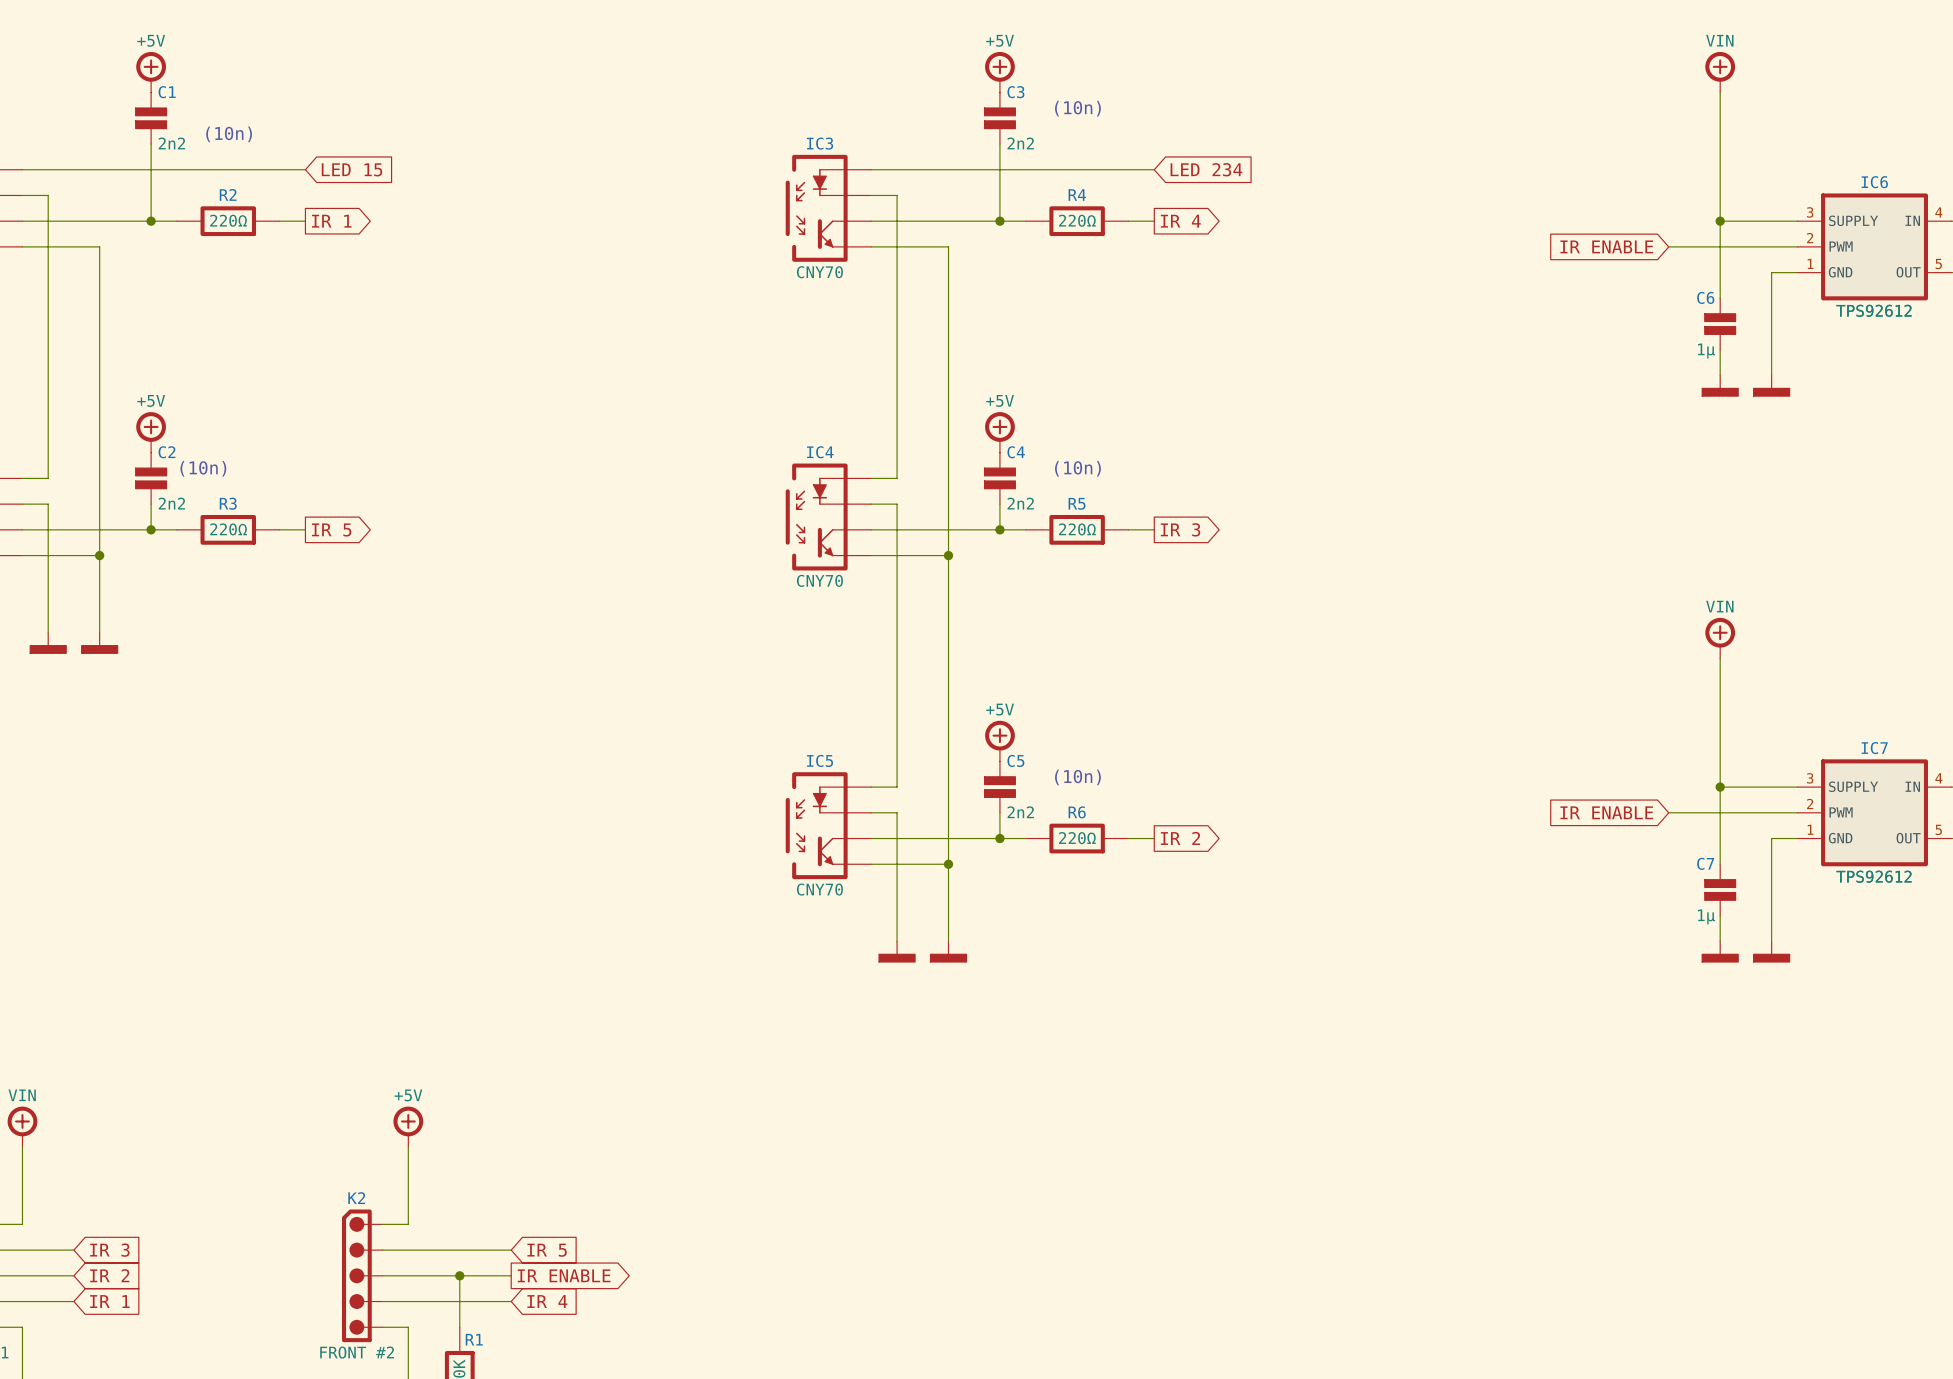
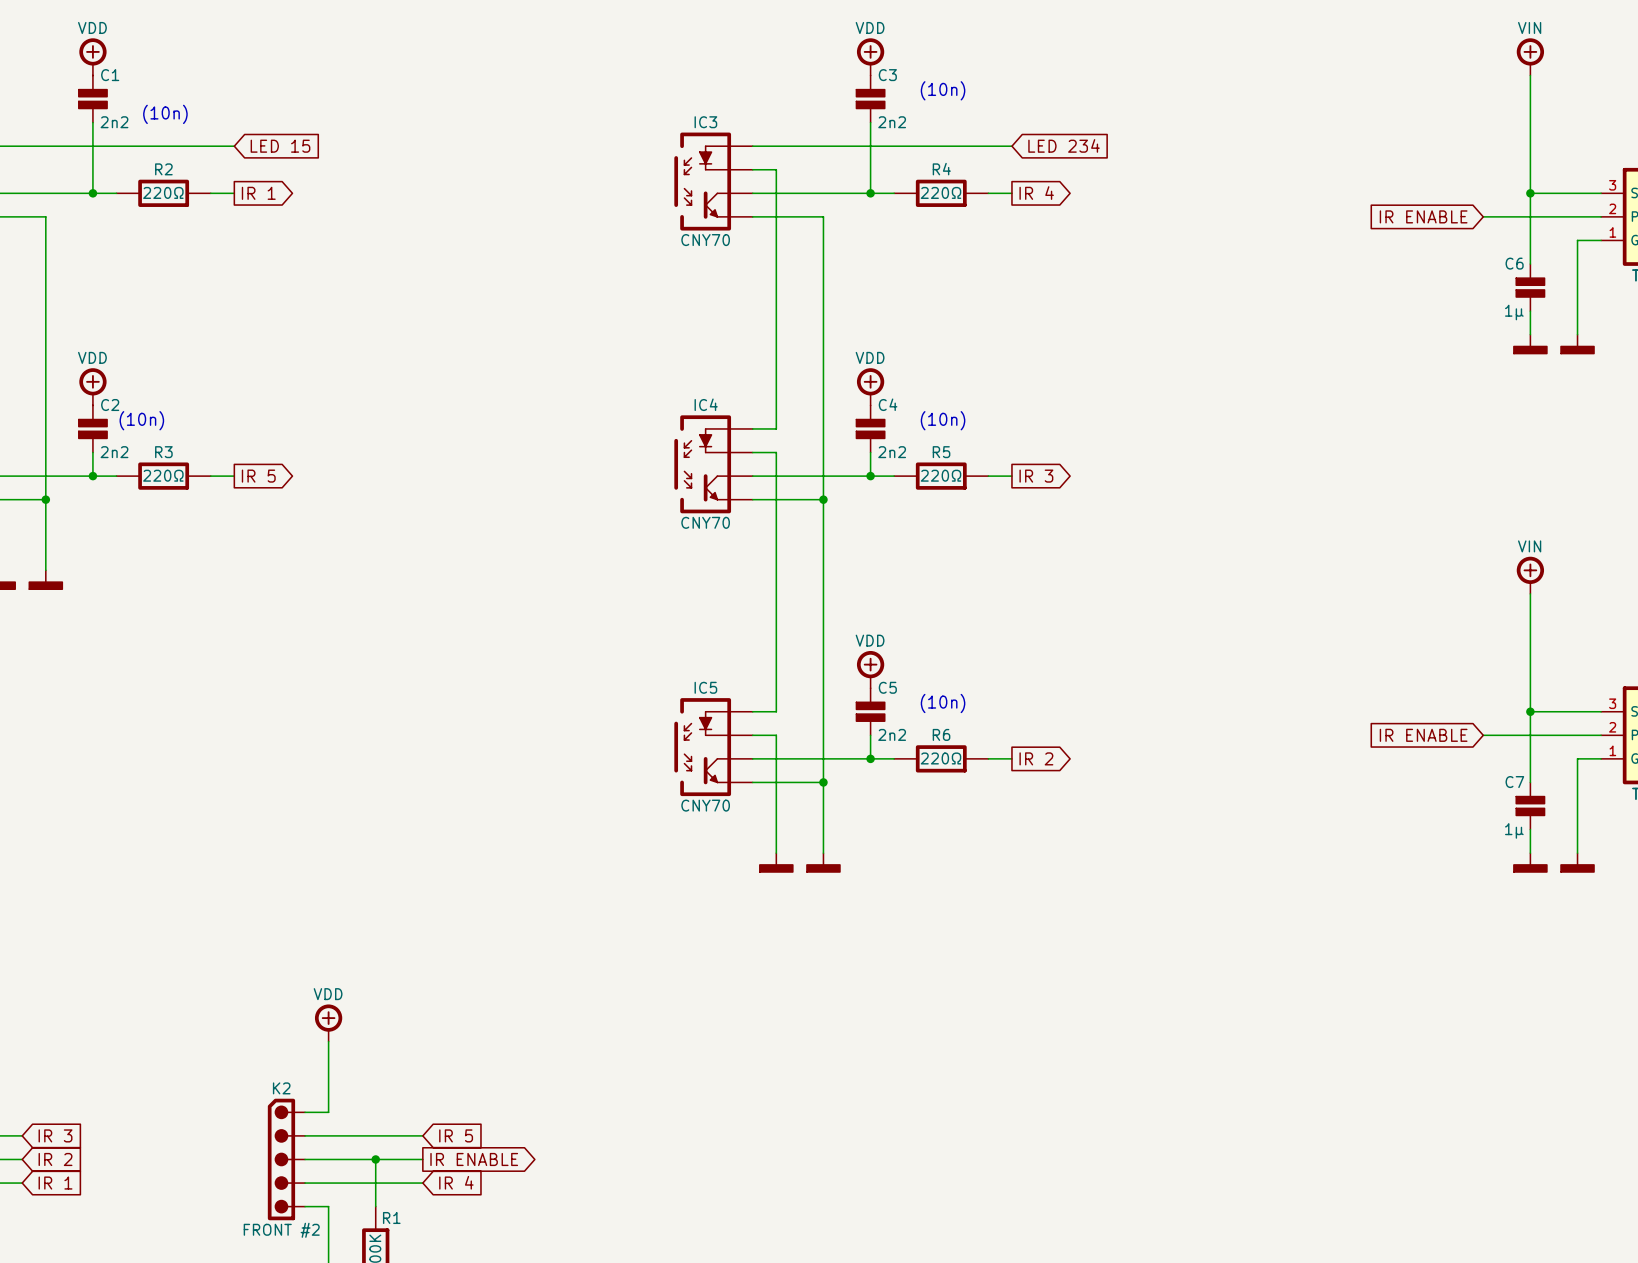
power symbol text: +5V (151, 40) -> VDD (92, 27)
power symbol text: +5V (1000, 40) -> VDD (870, 27)
power symbol text: +5V (151, 400) -> VDD (92, 357)
power symbol text: +5V (1000, 400) -> VDD (870, 357)
power symbol text: +5V (1000, 709) -> VDD (870, 640)
power symbol text: +5V (408, 1095) -> VDD (328, 994)

